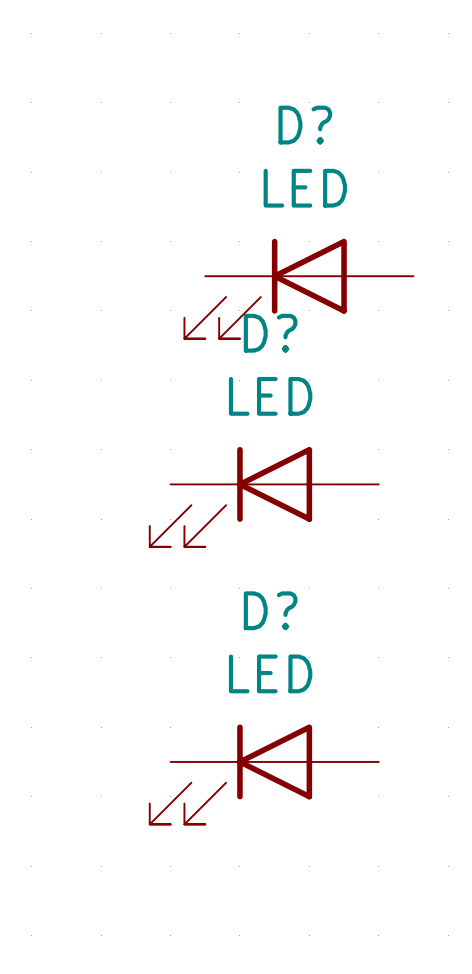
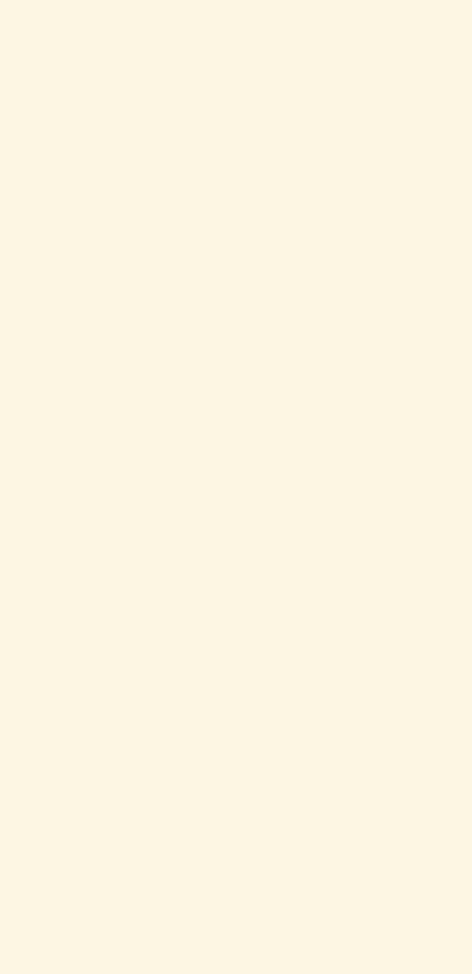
D?: LED (298, 288) -> none
D?: LED (264, 496) -> none
D?: LED (264, 774) -> none

